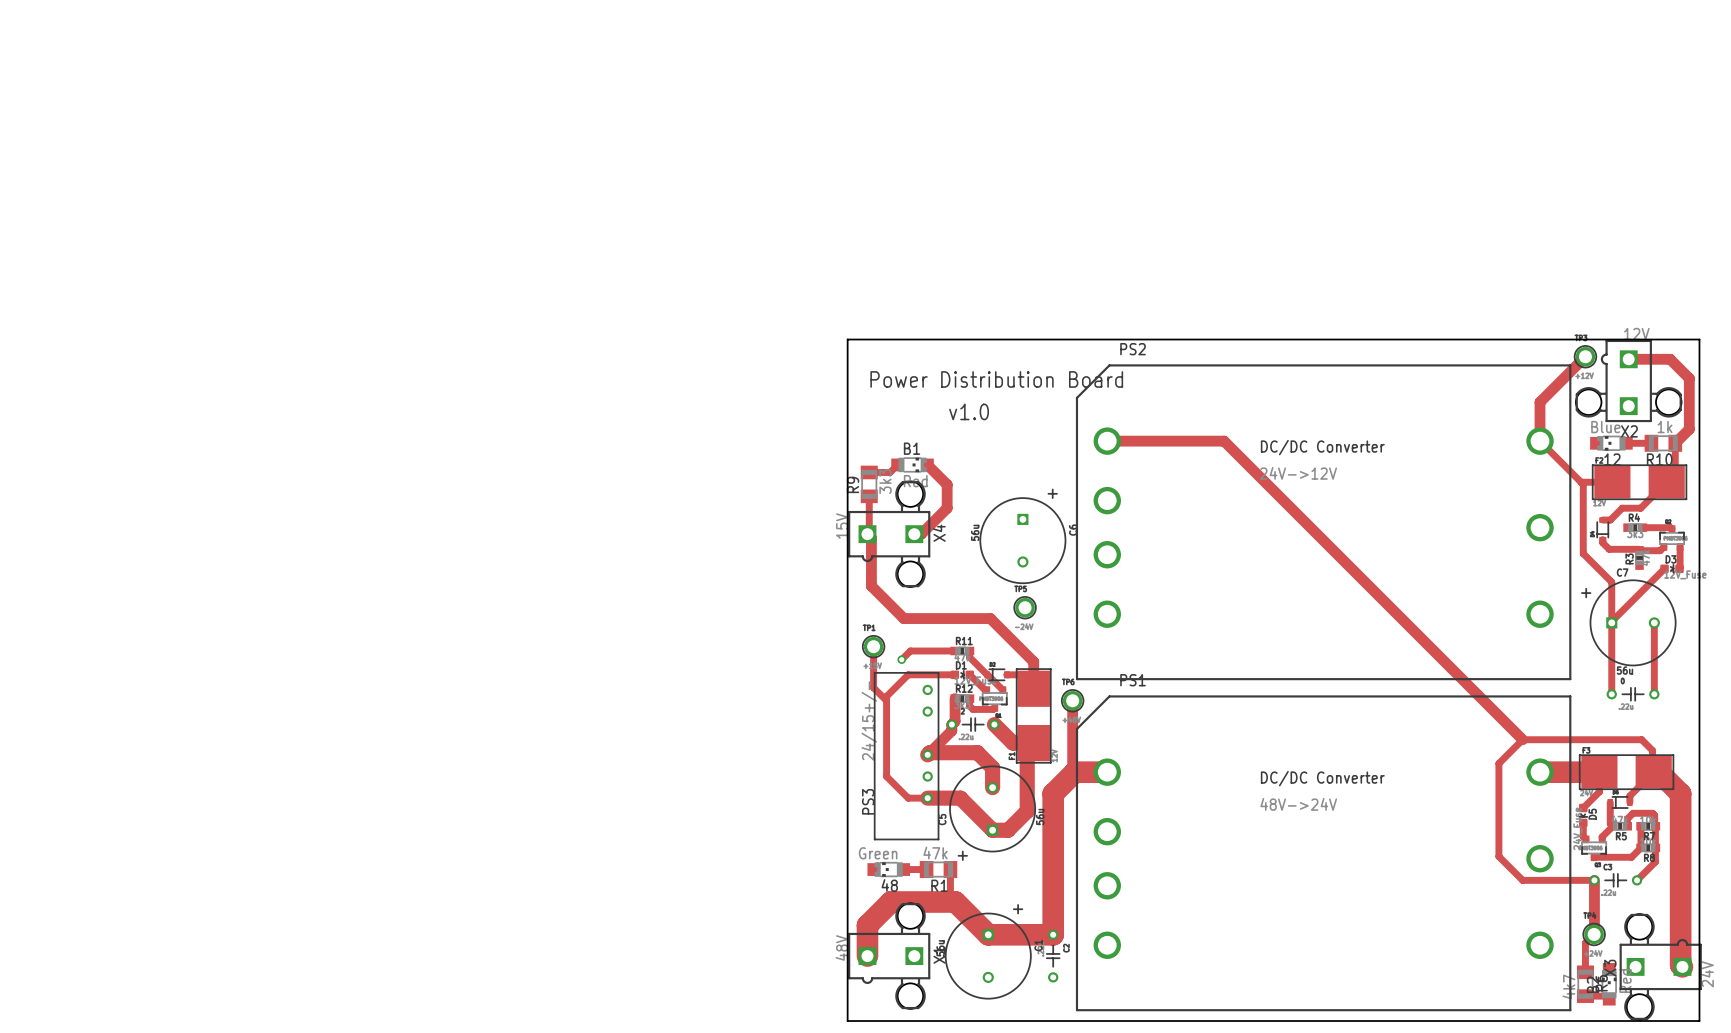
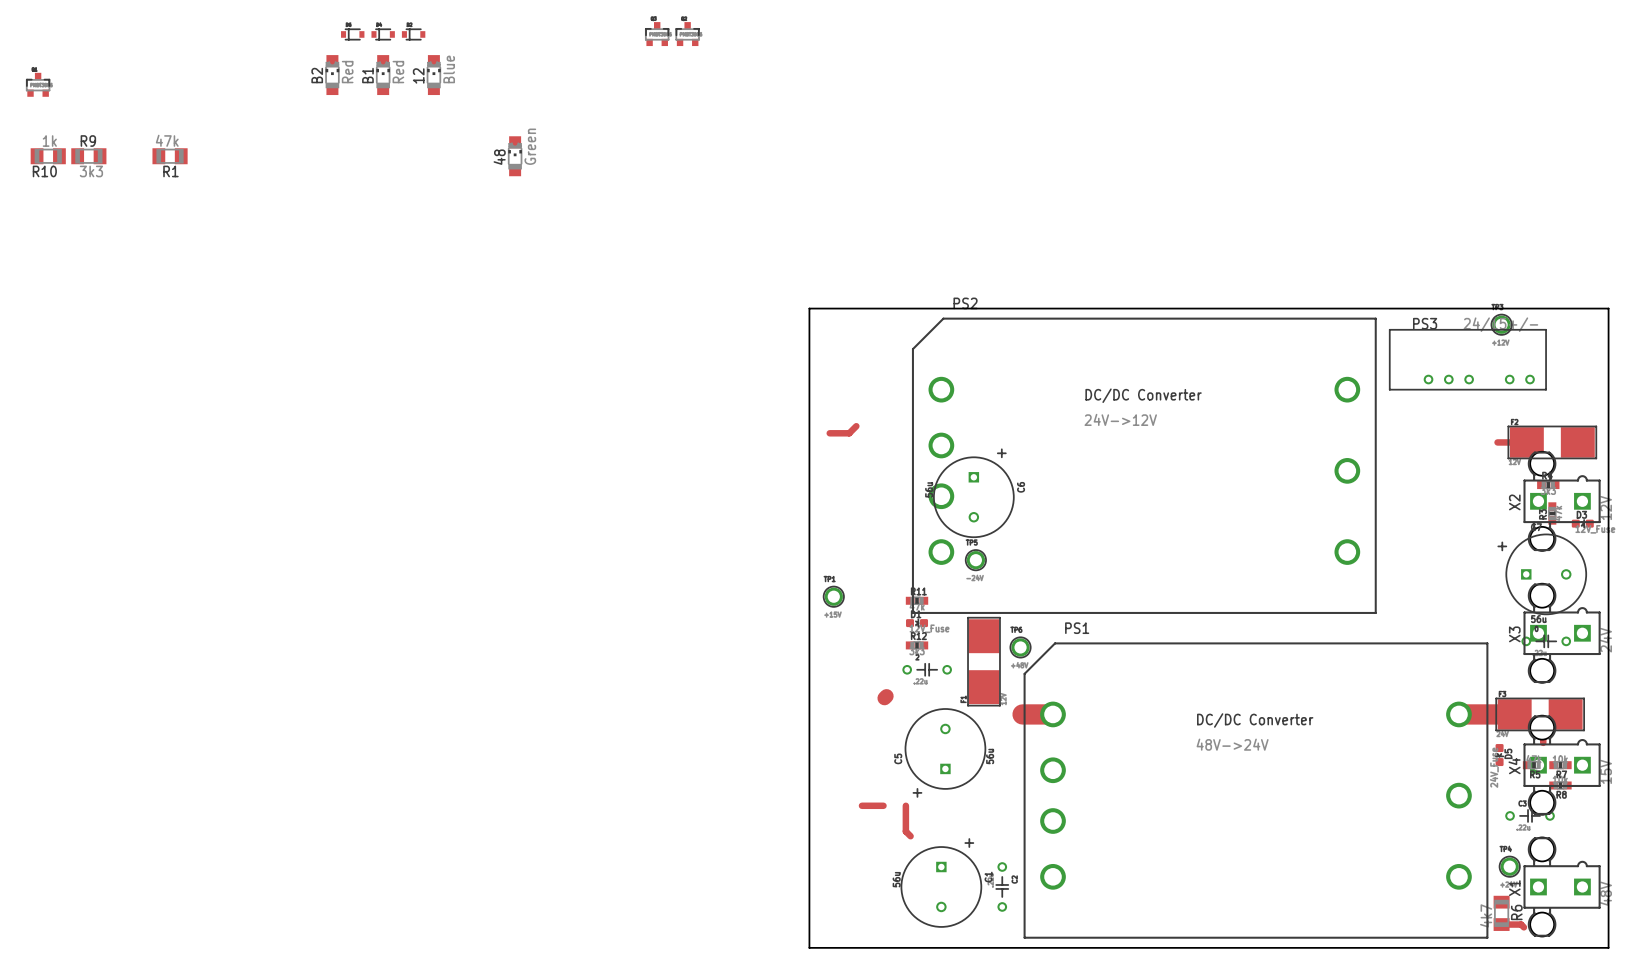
track: (1585, 356) (1540, 402) (1540, 441) (1583, 484) (1583, 553) (1611, 582) (1611, 694) -> none
track: (1628, 359) (1670, 359) (1689, 378) (1689, 429) (1675, 443) (1675, 473) (1640, 508) (1622, 508) (1610, 520) (1602, 520) -> none
text: Power Distribution Board (996, 379) -> none
X2 rotation: 0° (1628, 381) -> 90° clockwise (1562, 501)
X2 position: (1628, 381) -> (1562, 501)
text: v1.0 (969, 411) -> none
track: (1107, 441) (1224, 441) (1522, 739) -> none
12 rotation: 0° (1611, 443) -> 90° clockwise (433, 75)
12 position: (1611, 443) -> (433, 75)
track: (1626, 443) (1651, 443) -> none
R10 position: (1663, 443) -> (48, 156)
B1 rotation: 0° (912, 464) -> 90° counterclockwise (383, 75)
B1 position: (912, 464) -> (383, 75)
track: (927, 464) (947, 484) (947, 508) (921, 534) (914, 534) -> none
R9 rotation: 0° (869, 484) -> 90° clockwise (88, 156)
R9 position: (869, 484) -> (88, 156)
track: (869, 496) (869, 532) (867, 534) (871, 538) (871, 586) (903, 618) (990, 618) (1033, 661) (1033, 688) (1019, 674) (1006, 674) -> none
PS2 position: (1323, 522) -> (1144, 465)
track: (1642, 527) (1672, 529) -> none
part rotation: 0° (1602, 529) -> 90° clockwise (383, 34)
part position: (1602, 529) -> (383, 34)
X4 rotation: 0° (889, 534) -> 180° (1562, 765)
X4 position: (889, 534) -> (1562, 765)
part position: (1672, 538) -> (687, 34)
track: (1602, 539) (1602, 542) (1609, 549) (1660, 550) (1663, 547) -> none
track: (1680, 547) (1679, 568) -> none
track: (1664, 568) (1611, 621) -> none
track: (1654, 622) (1654, 694) -> none
track: (873, 646) (873, 687) (886, 700) -> none
track: (955, 651) (910, 651) (901, 659) -> none
track: (969, 651) (969, 657) (1002, 690) -> none
via: (901, 659) -> none
track: (954, 674) (908, 674) (886, 696) (886, 776) (908, 798) (960, 798) (992, 830) (1008, 830) (1027, 811) (1027, 749) (1033, 743) (1012, 743) (994, 724) -> none
track: (969, 674) (986, 690) -> none
part position: (996, 674) -> (413, 34)
track: (955, 698) (955, 721) (951, 724) (951, 730) (929, 752) (977, 752) (992, 767) (992, 787) -> none
track: (969, 698) (969, 705) (973, 709) (994, 707) -> none
part rotation: 0° (994, 699) -> 180° (38, 84)
part position: (994, 699) -> (38, 84)
track: (1072, 700) (1072, 770) (1074, 772) (1053, 793) (1053, 934) (988, 934) (955, 902) (890, 902) (867, 925) (867, 956) -> none
track: (1522, 739) (1498, 763) (1498, 856) (1522, 880) (1594, 880) (1594, 934) (1585, 943) (1585, 972) -> none
track: (1522, 739) (1641, 739) (1652, 750) (1652, 770) (1659, 772) (1680, 793) (1680, 965) (1682, 966) -> none
PS3 rotation: 0° (906, 756) -> 90° clockwise (1467, 359)
PS3 position: (906, 756) -> (1467, 359)
track: (1599, 772) (1599, 791) (1583, 807) -> none
track: (1610, 802) (1610, 823) (1612, 826) (1602, 836) (1602, 839) -> none
part position: (1620, 802) -> (352, 34)
track: (1583, 822) (1583, 836) (1586, 839) -> none
track: (1627, 826) (1627, 819) (1633, 813) (1652, 813) (1654, 815) (1655, 861) (1637, 880) -> none
track: (1640, 826) (1640, 847) (1631, 857) (1594, 857) -> none
part rotation: 0° (1594, 848) -> 180° (657, 34)
part position: (1594, 848) -> (657, 34)
48 rotation: 0° (888, 869) -> 90° clockwise (515, 156)
48 position: (888, 869) -> (515, 156)
R1 position: (938, 869) -> (170, 156)
X1 rotation: 0° (889, 956) -> 180° (1562, 886)
X1 position: (889, 956) -> (1562, 886)
X3 position: (1660, 966) -> (1562, 633)
B2 position: (1609, 984) -> (332, 75)

